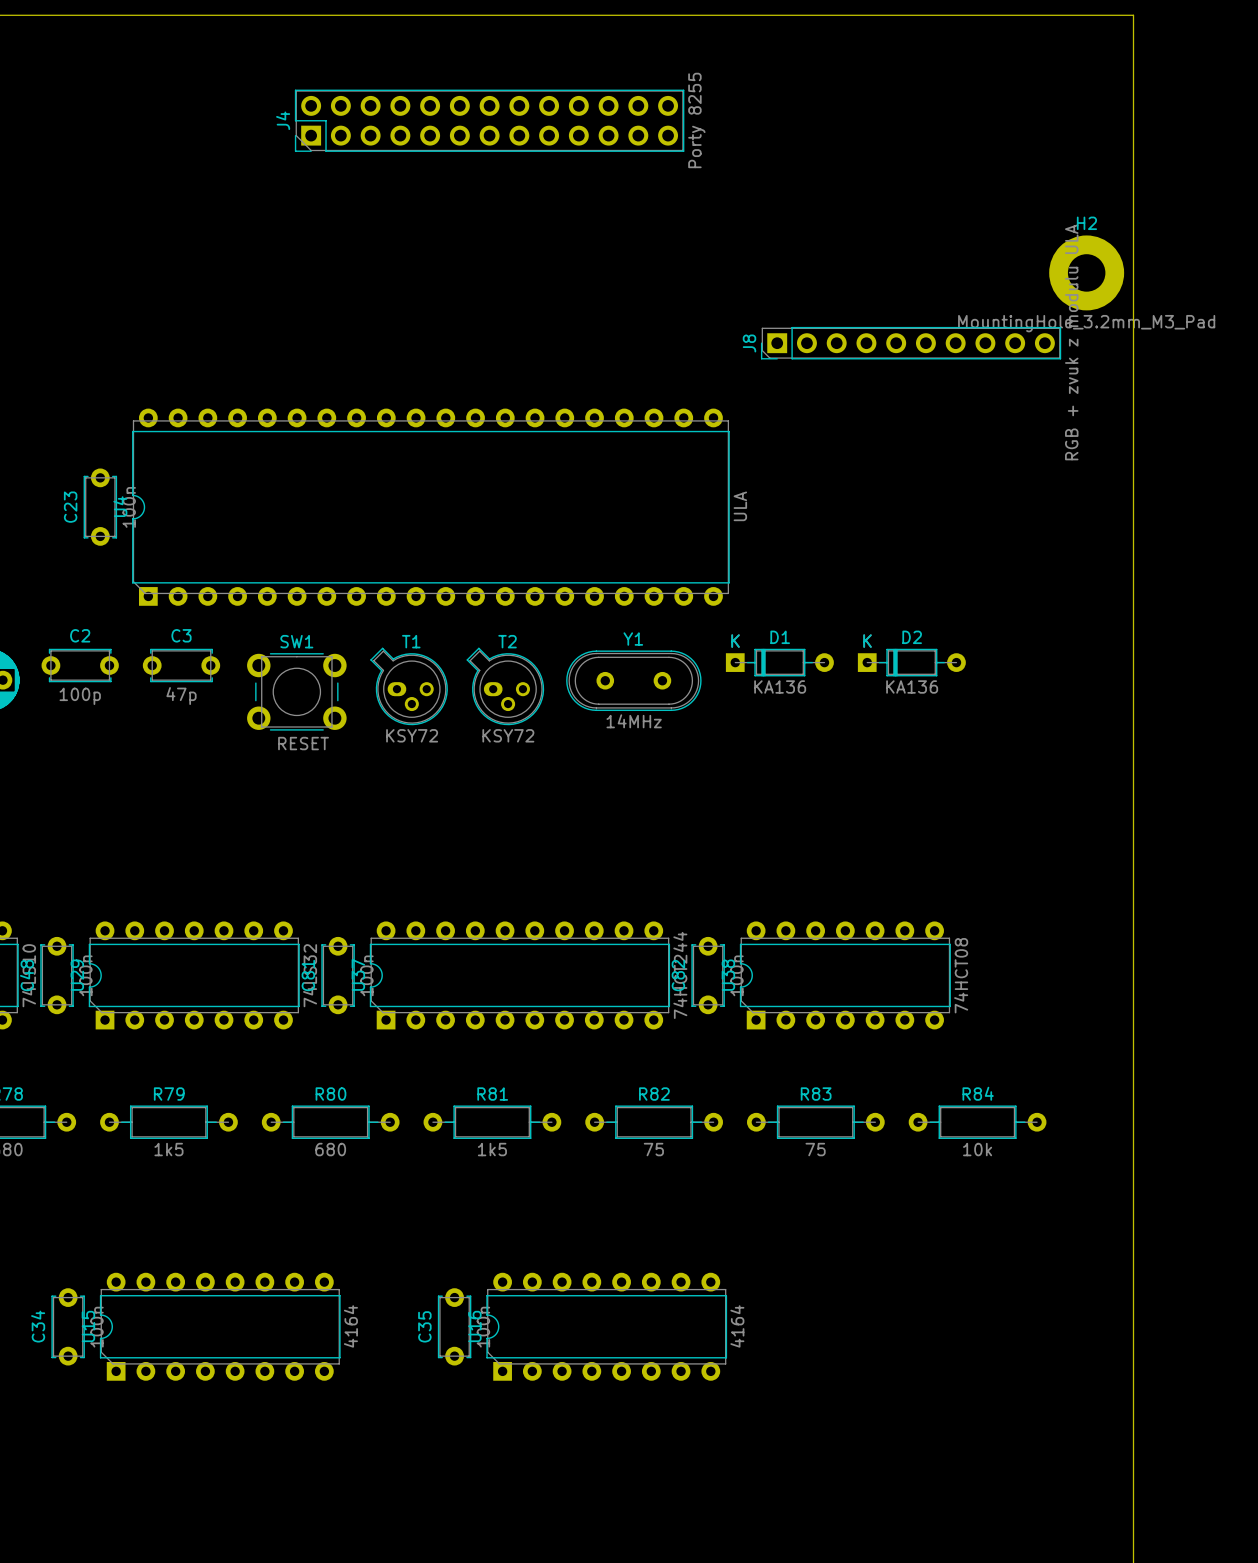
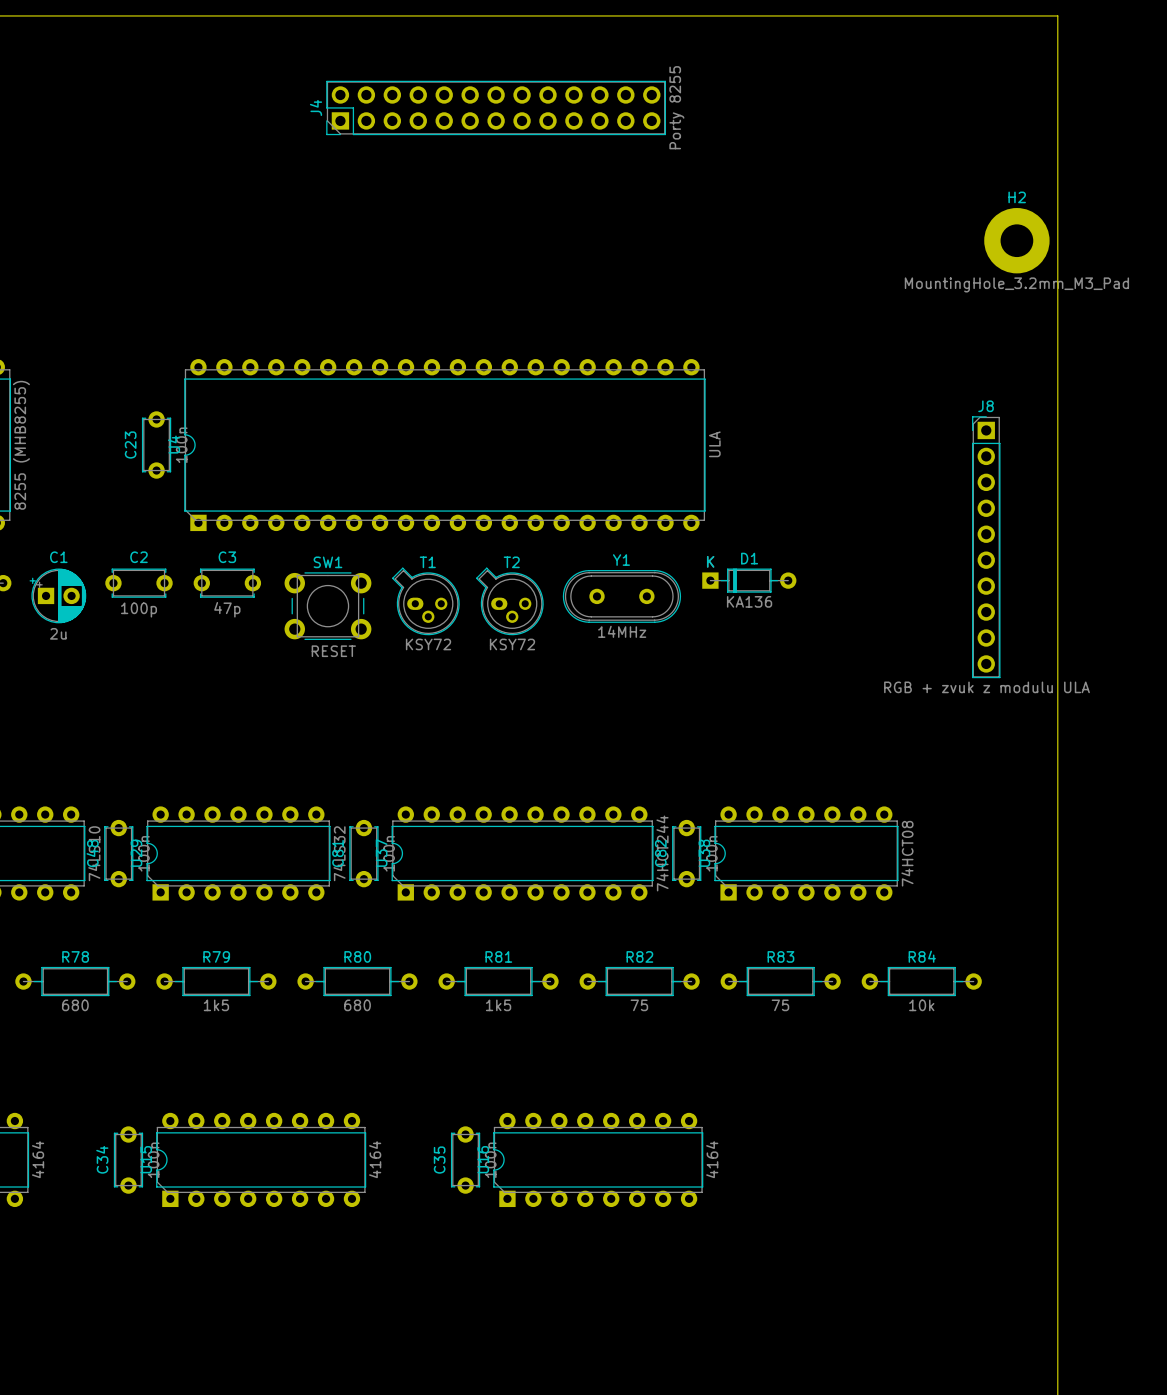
J8 rotation: 0° (911, 343) -> 90° clockwise (986, 547)
J8 position: (911, 343) -> (986, 547)
D2: KA136 (911, 662) -> none

